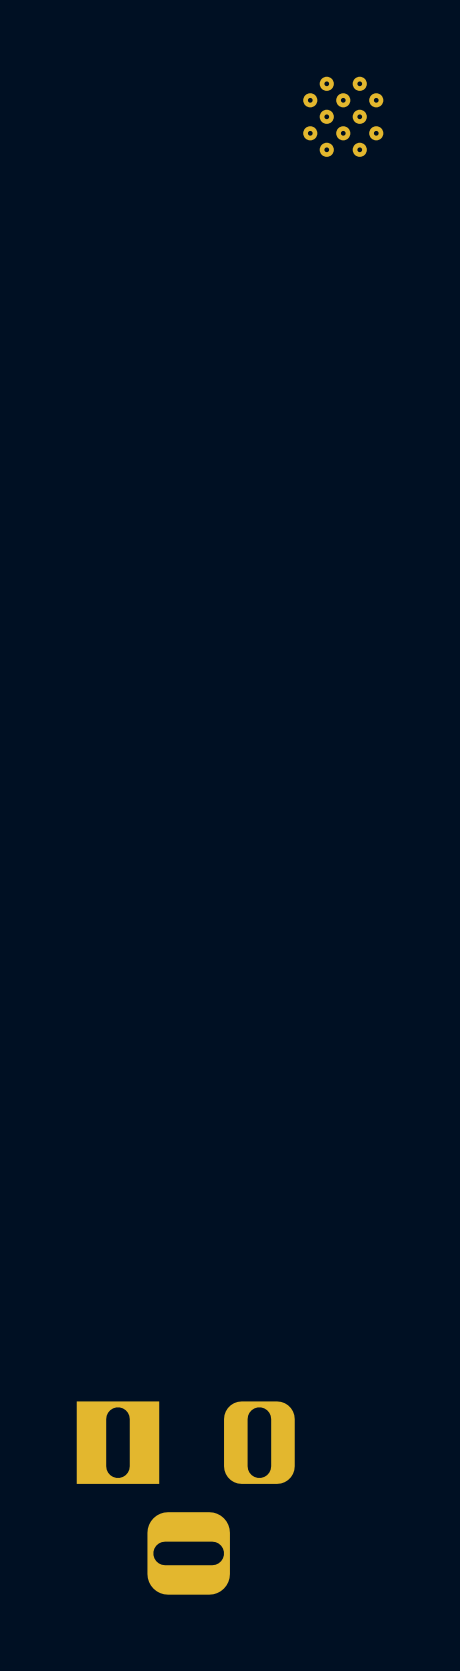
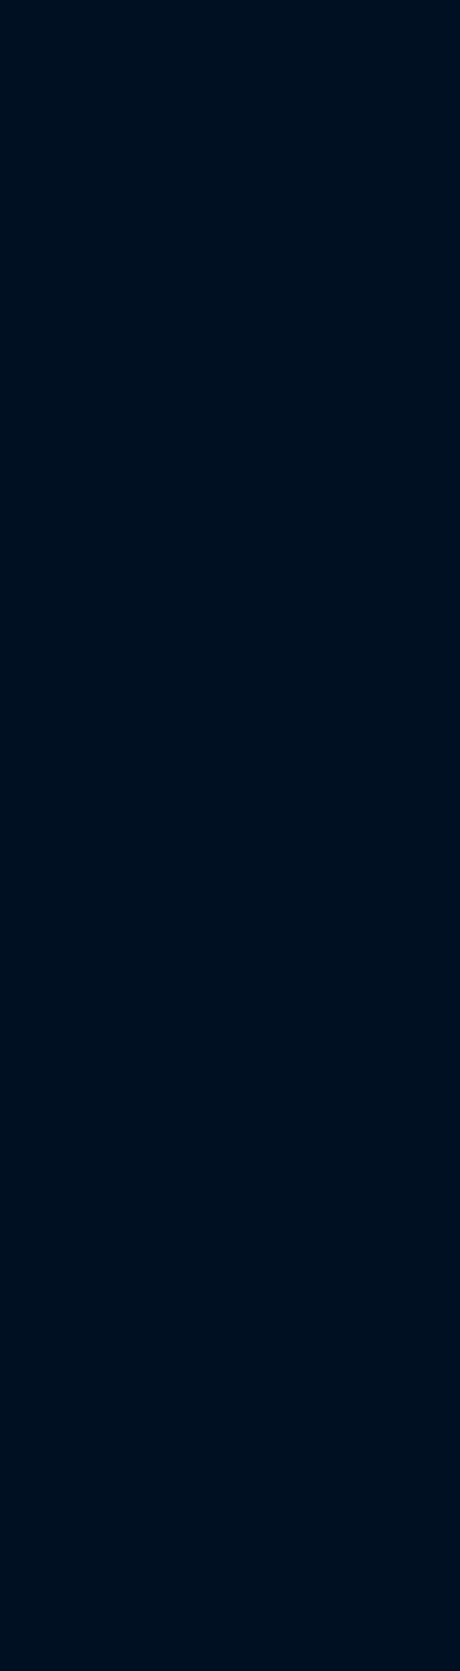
part: (343, 116) -> none
part: (185, 1498) -> none

